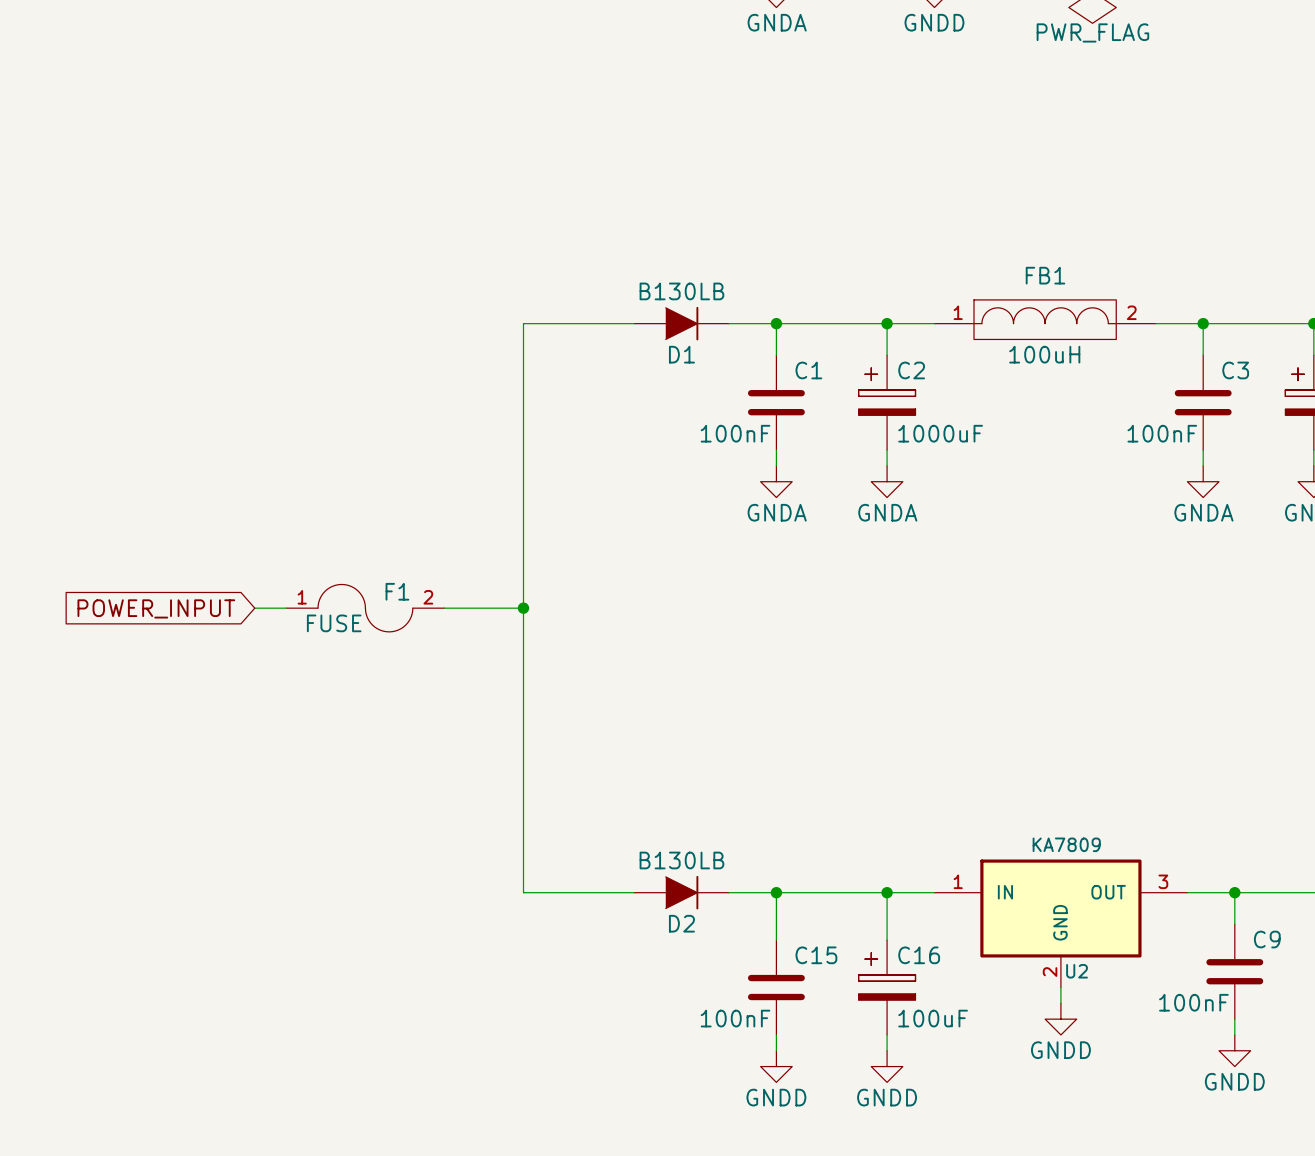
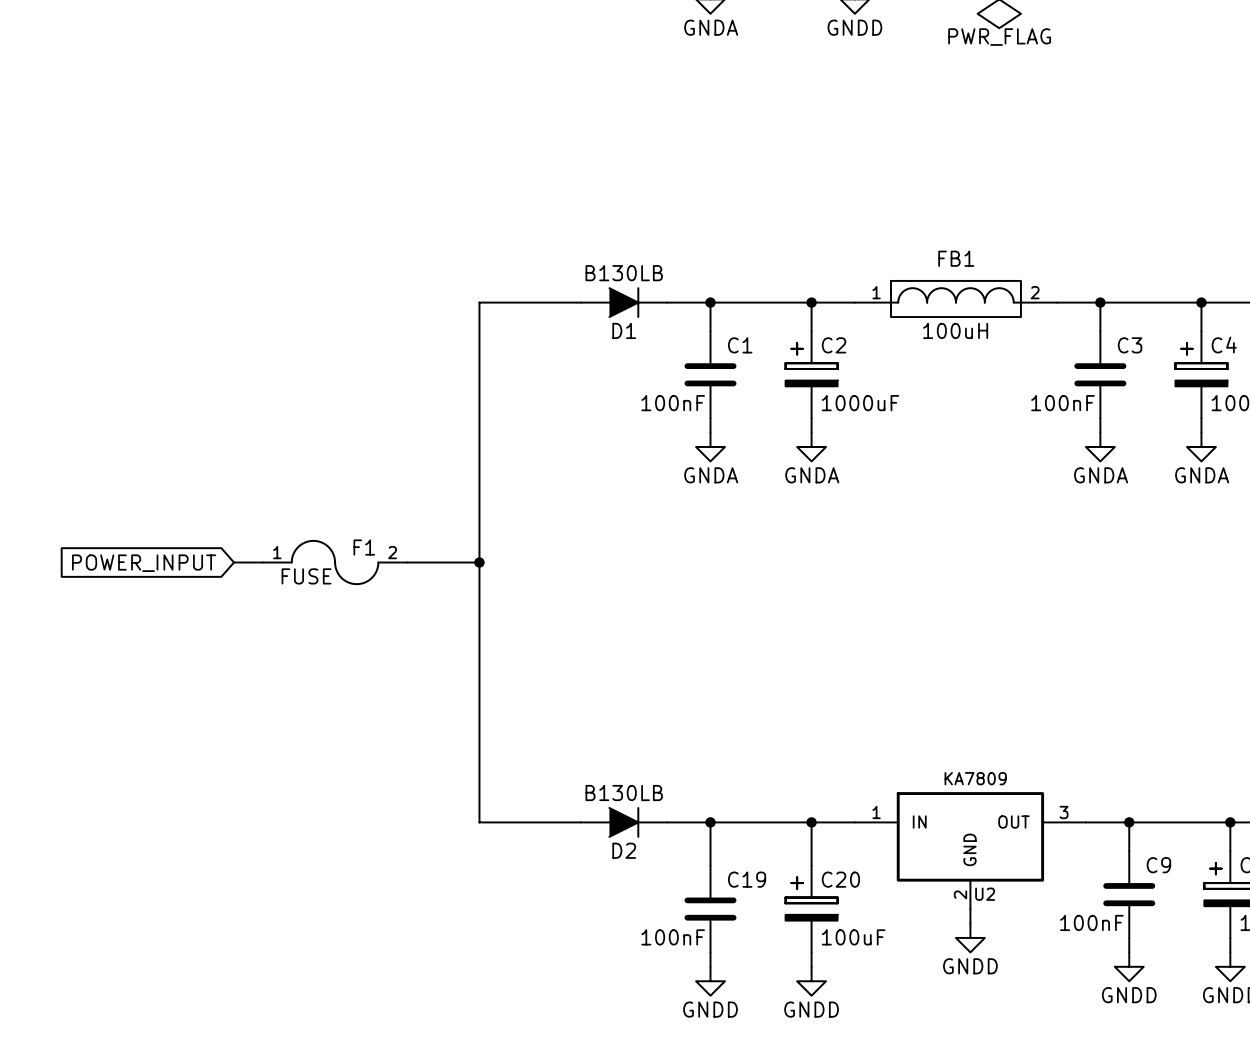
C15 name: C15 (816, 955) -> C19 (747, 879)
C16 name: C16 (919, 955) -> C20 (840, 879)

